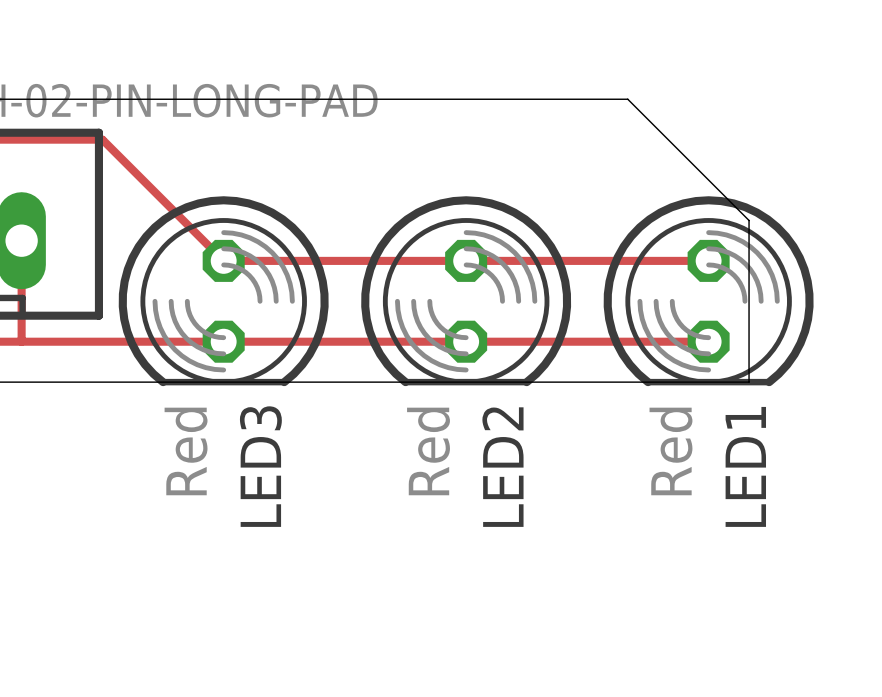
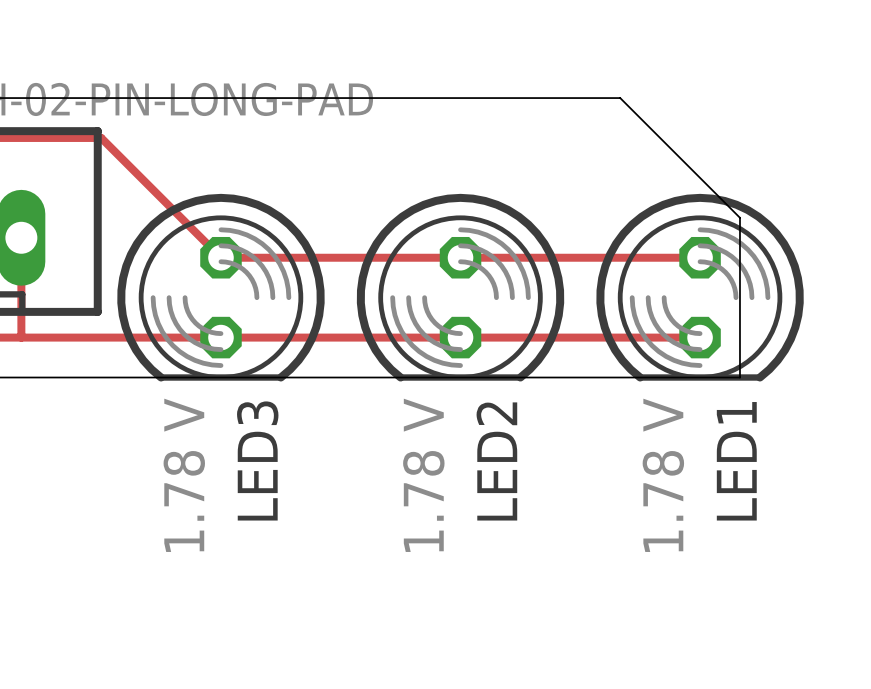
LED3 value: Red (186, 451) -> 1.78 V (184, 475)
LED2 value: Red (428, 451) -> 1.78 V (423, 475)
LED1 value: Red (670, 451) -> 1.78 V (663, 475)

